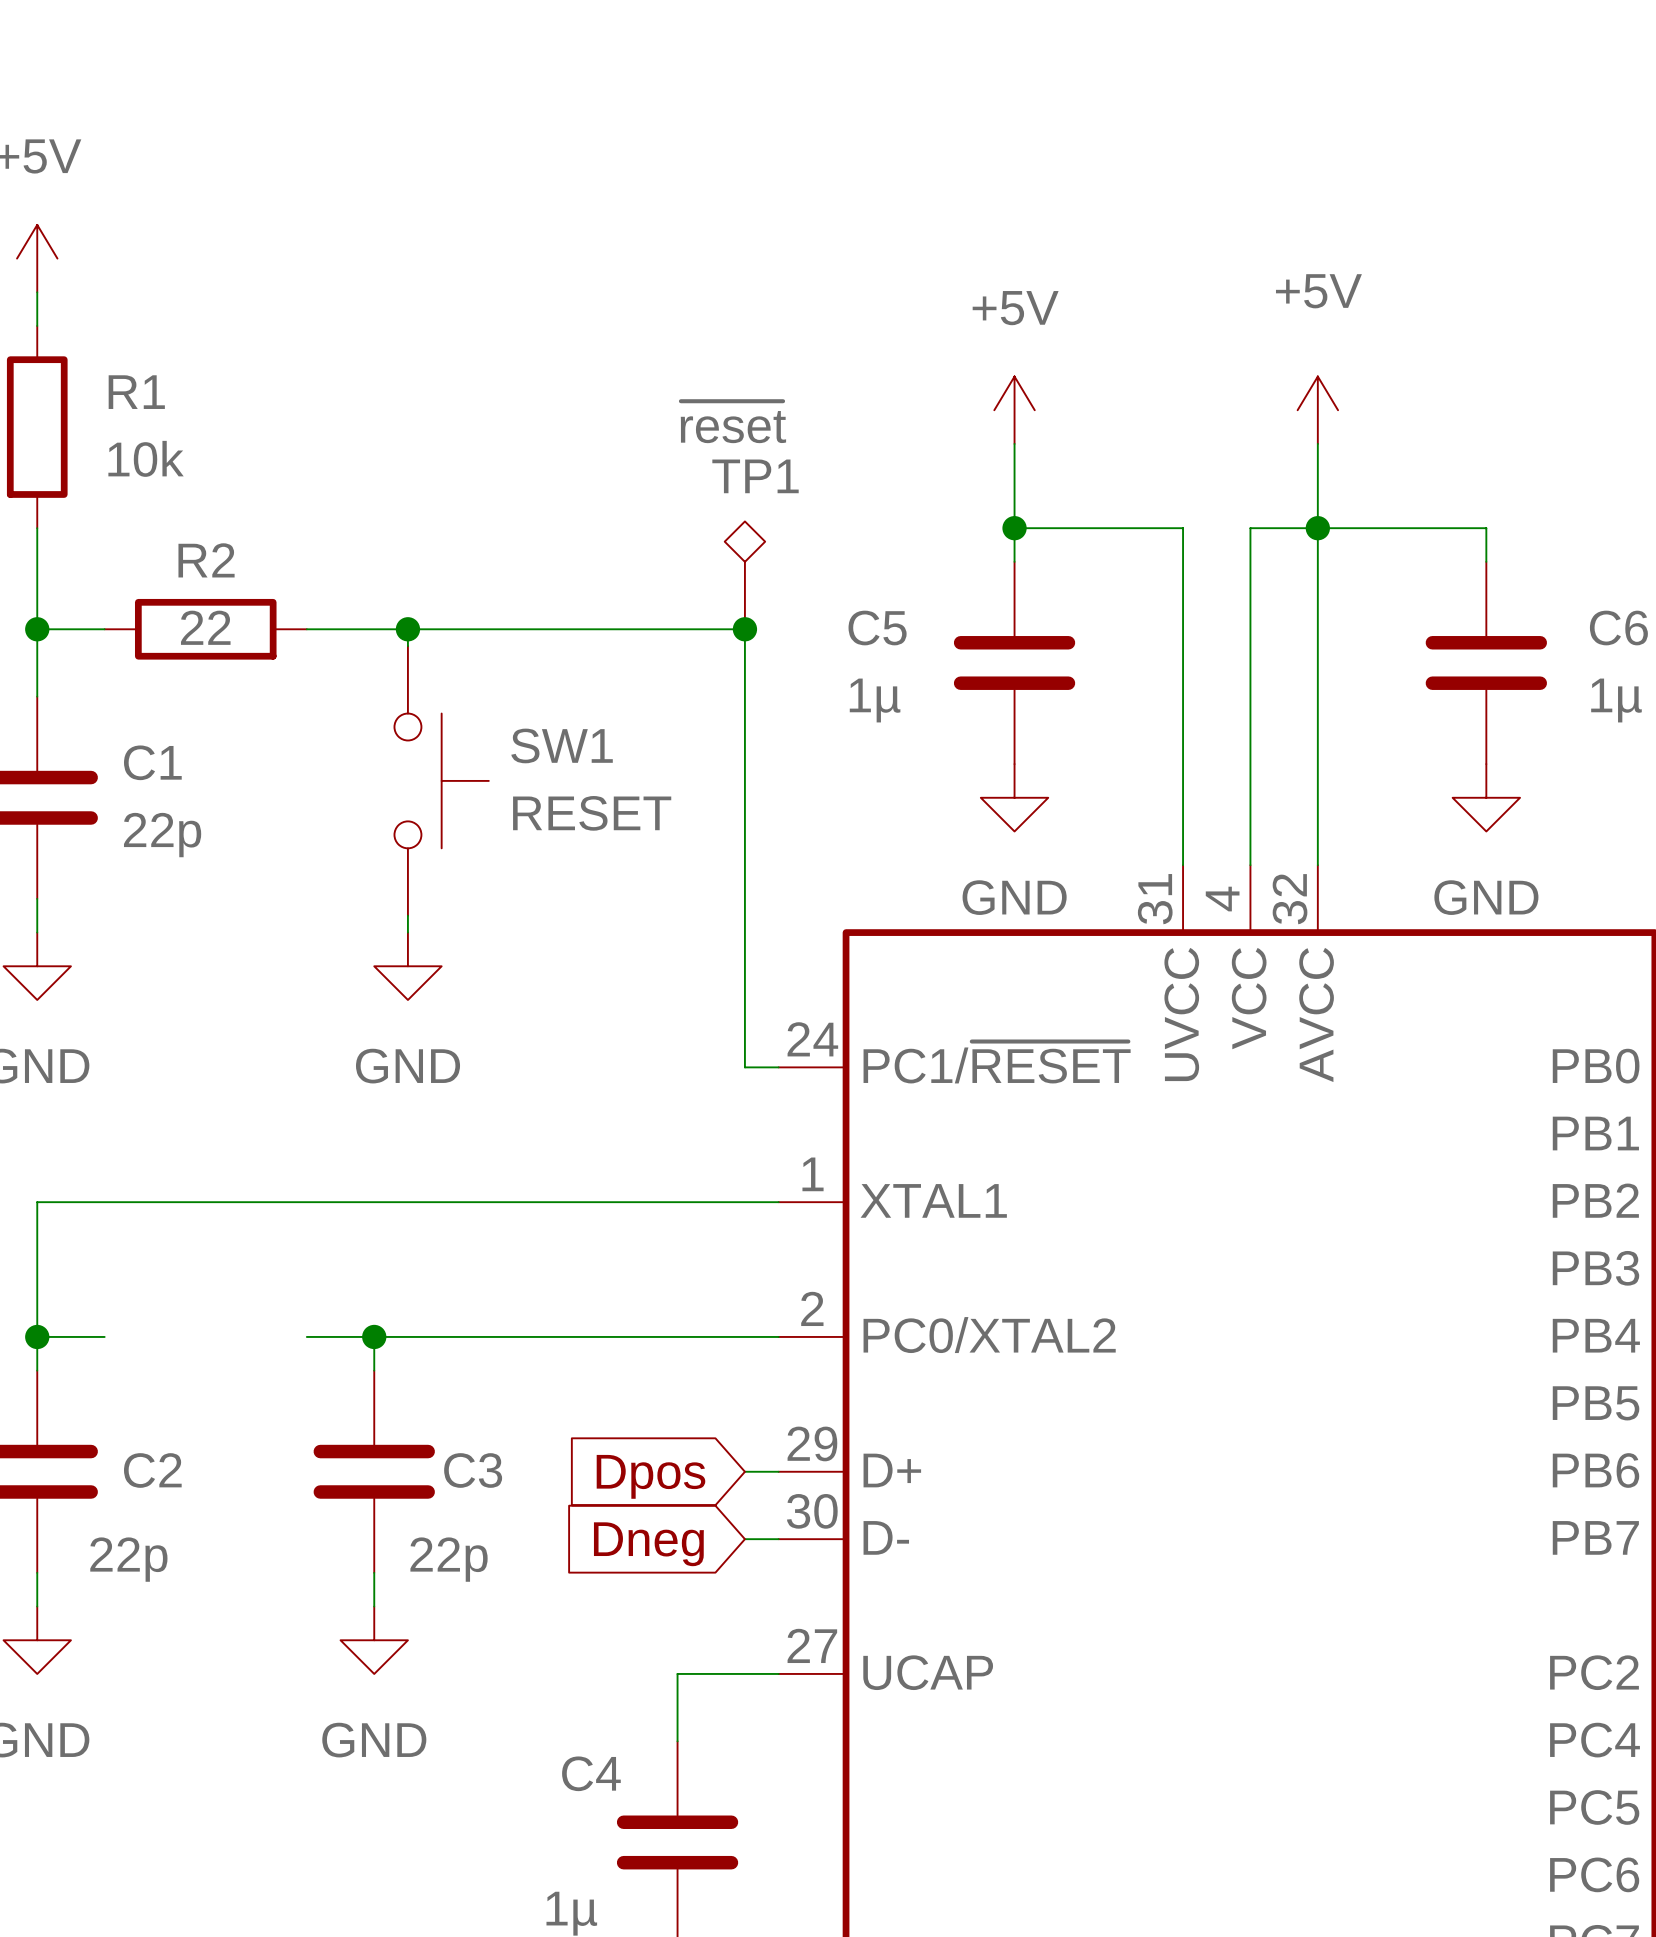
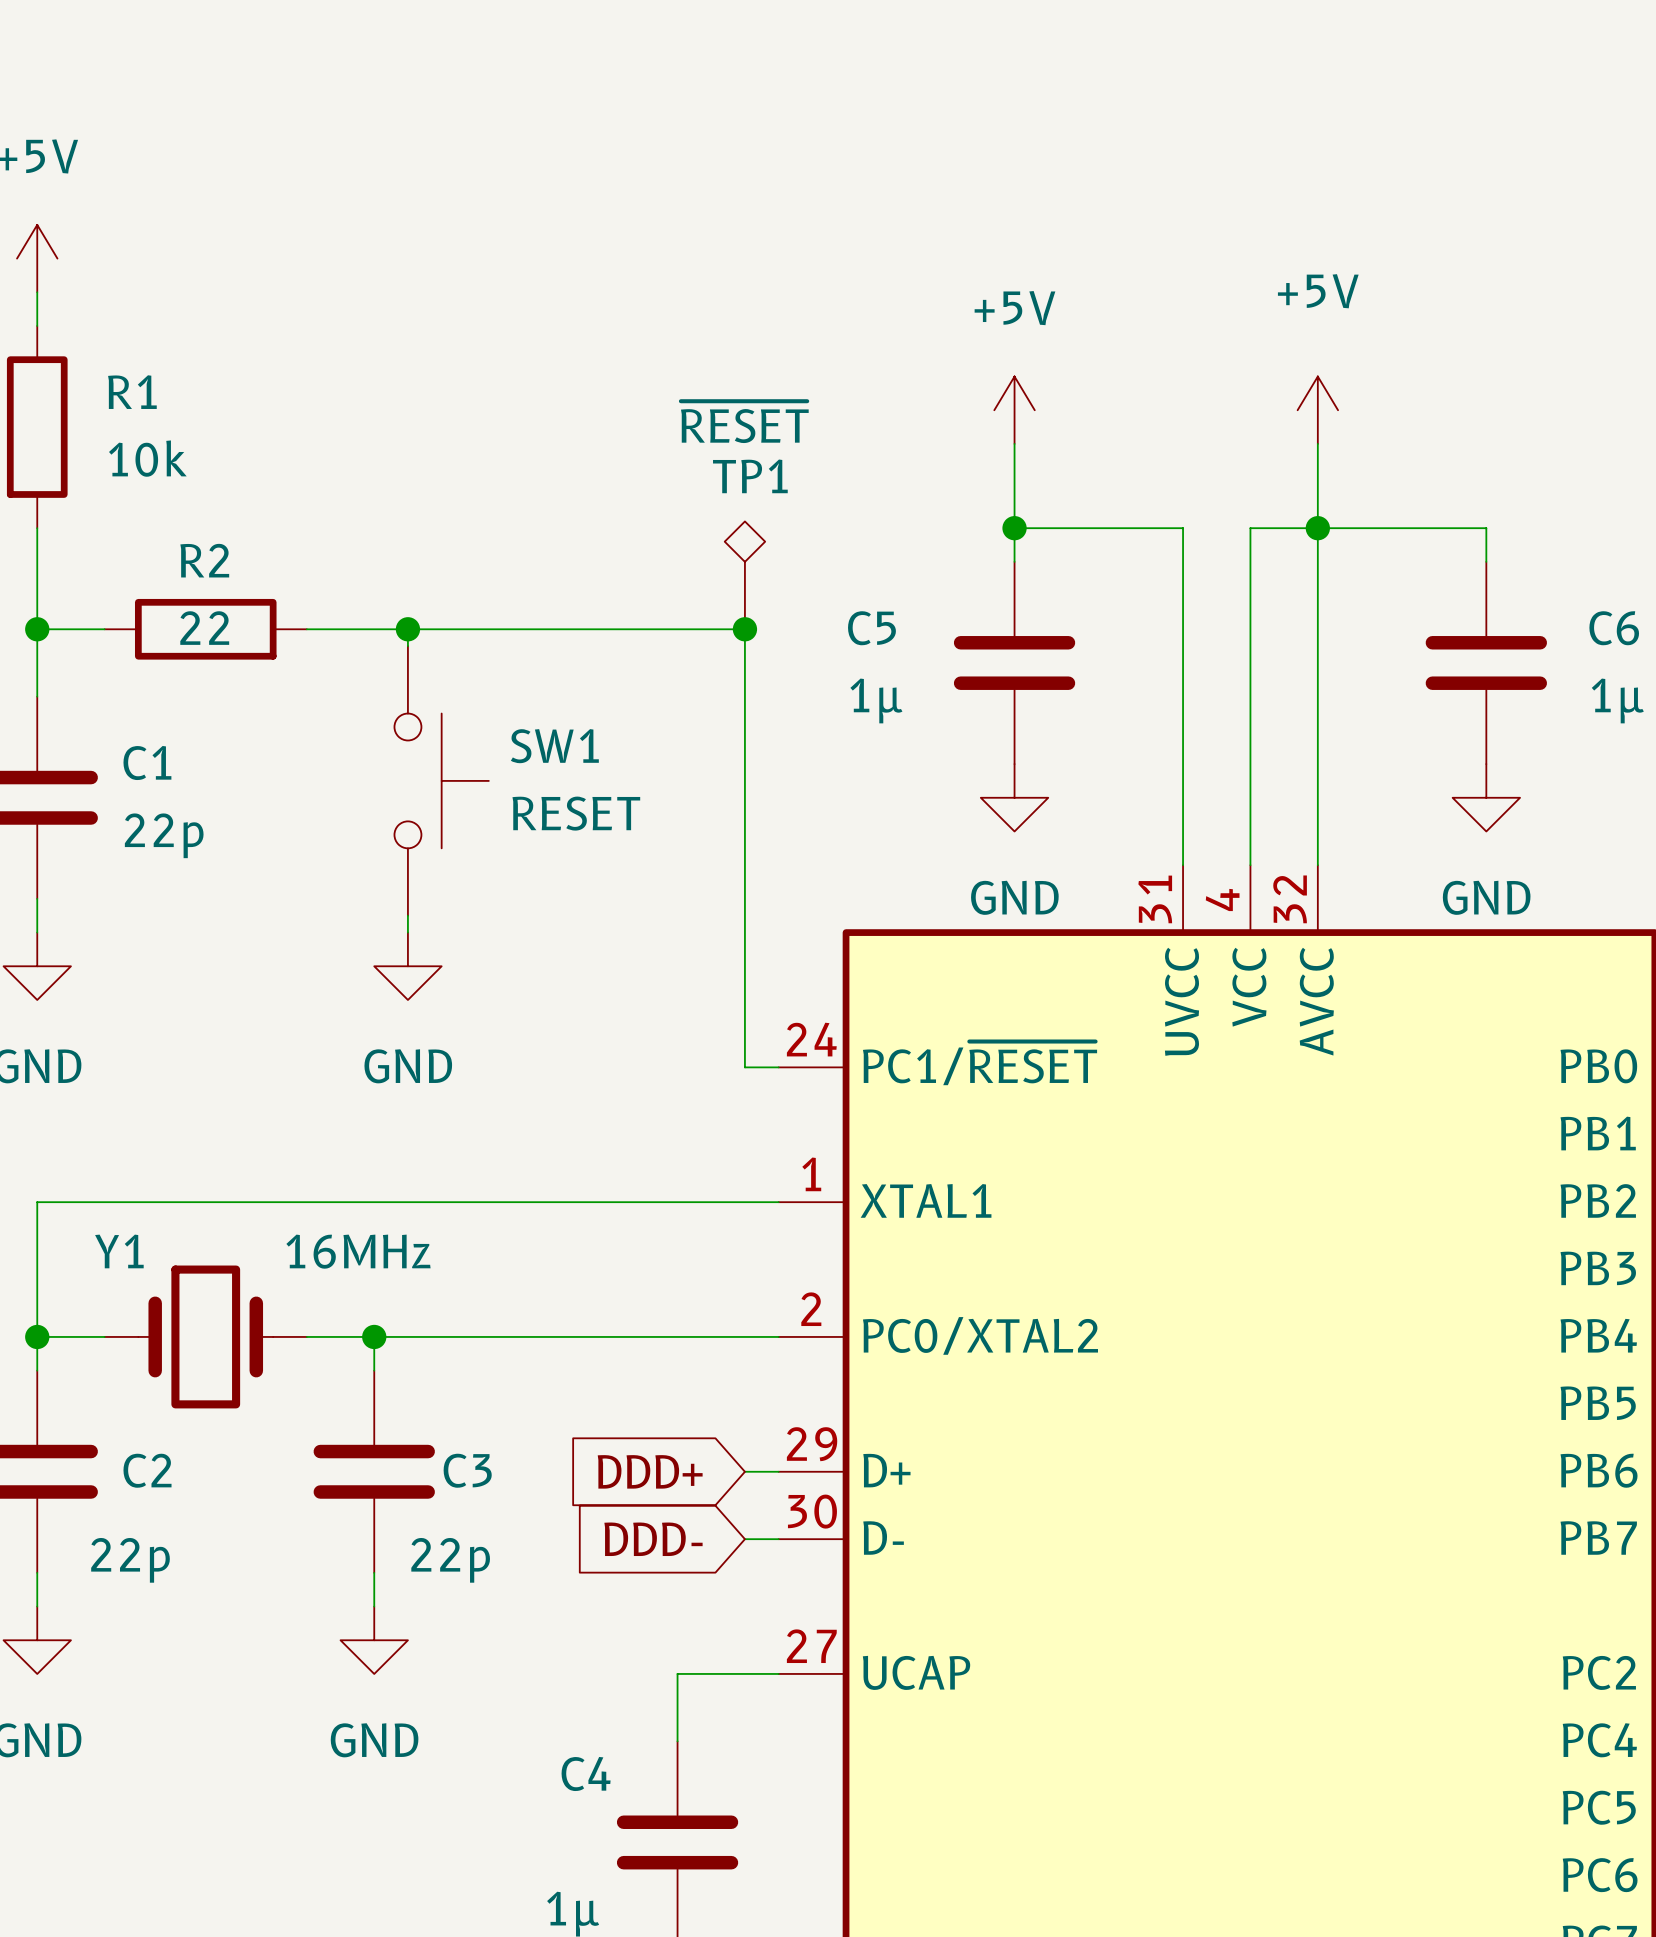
TP1 value: ~{reset} (733, 422) -> ~{RESET} (744, 422)
Y1: none -> 16MHz (205, 1336)
global label: Dpos (650, 1476) -> DDD+ (650, 1471)
global label: Dneg (648, 1544) -> DDD- (653, 1539)

